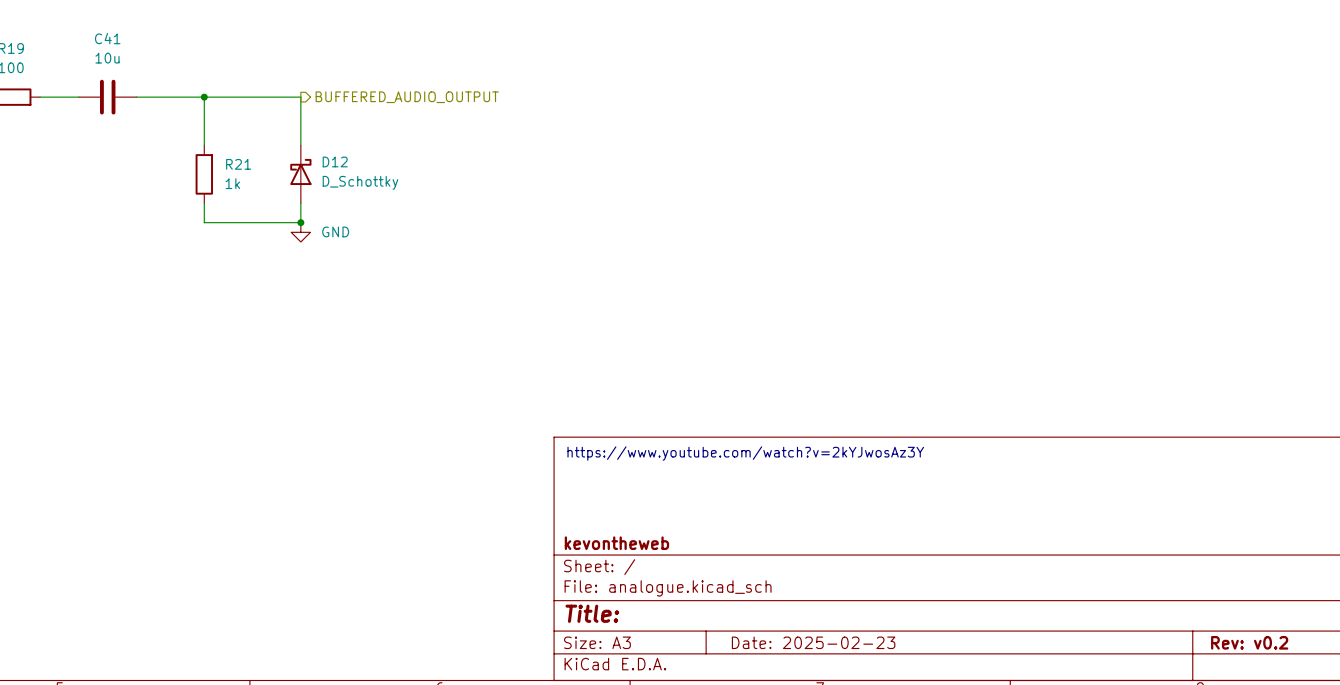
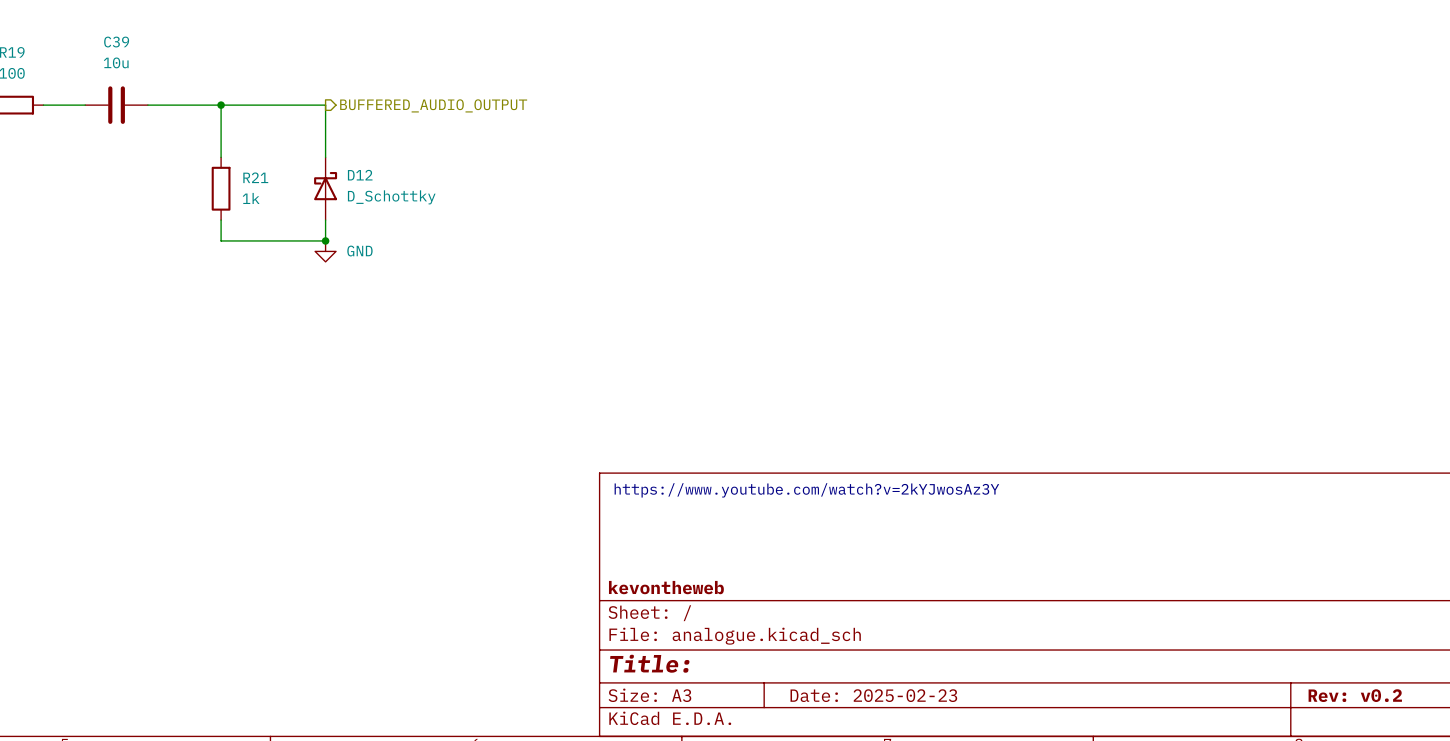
C41 name: C41 (107, 38) -> C39 (116, 42)

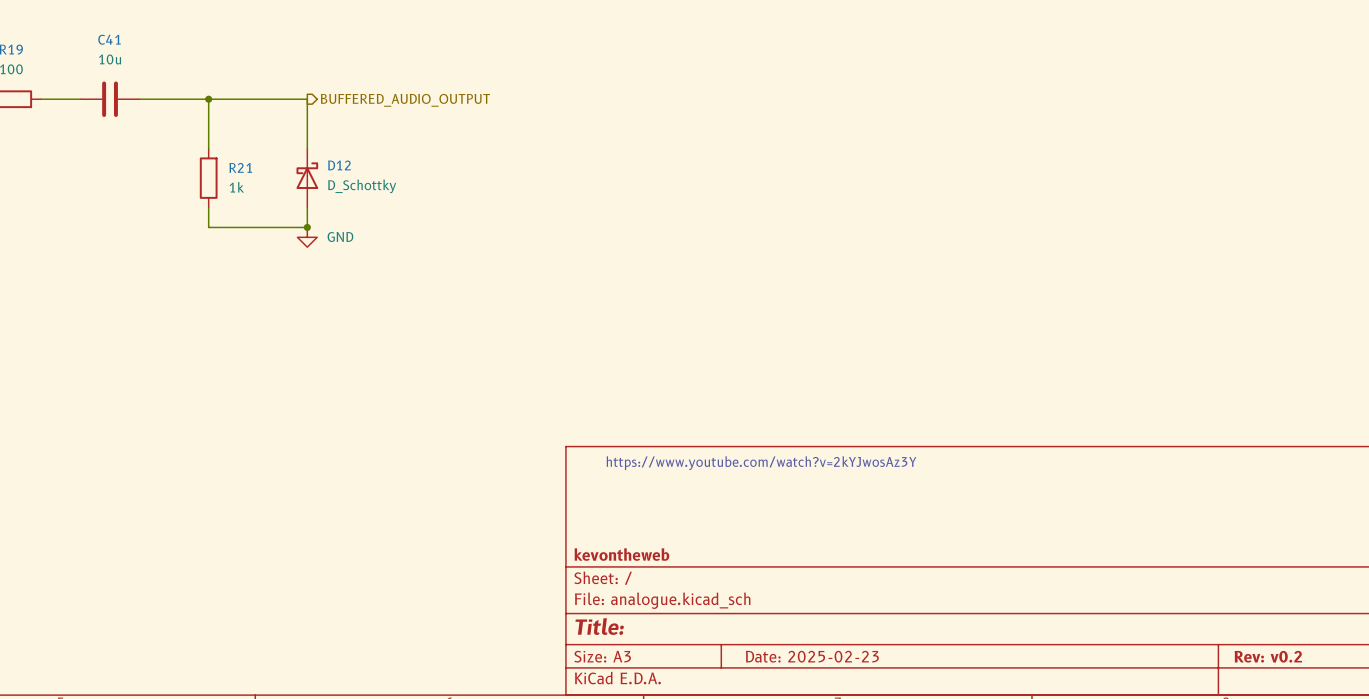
C39 name: C39 (116, 42) -> C41 (109, 39)

